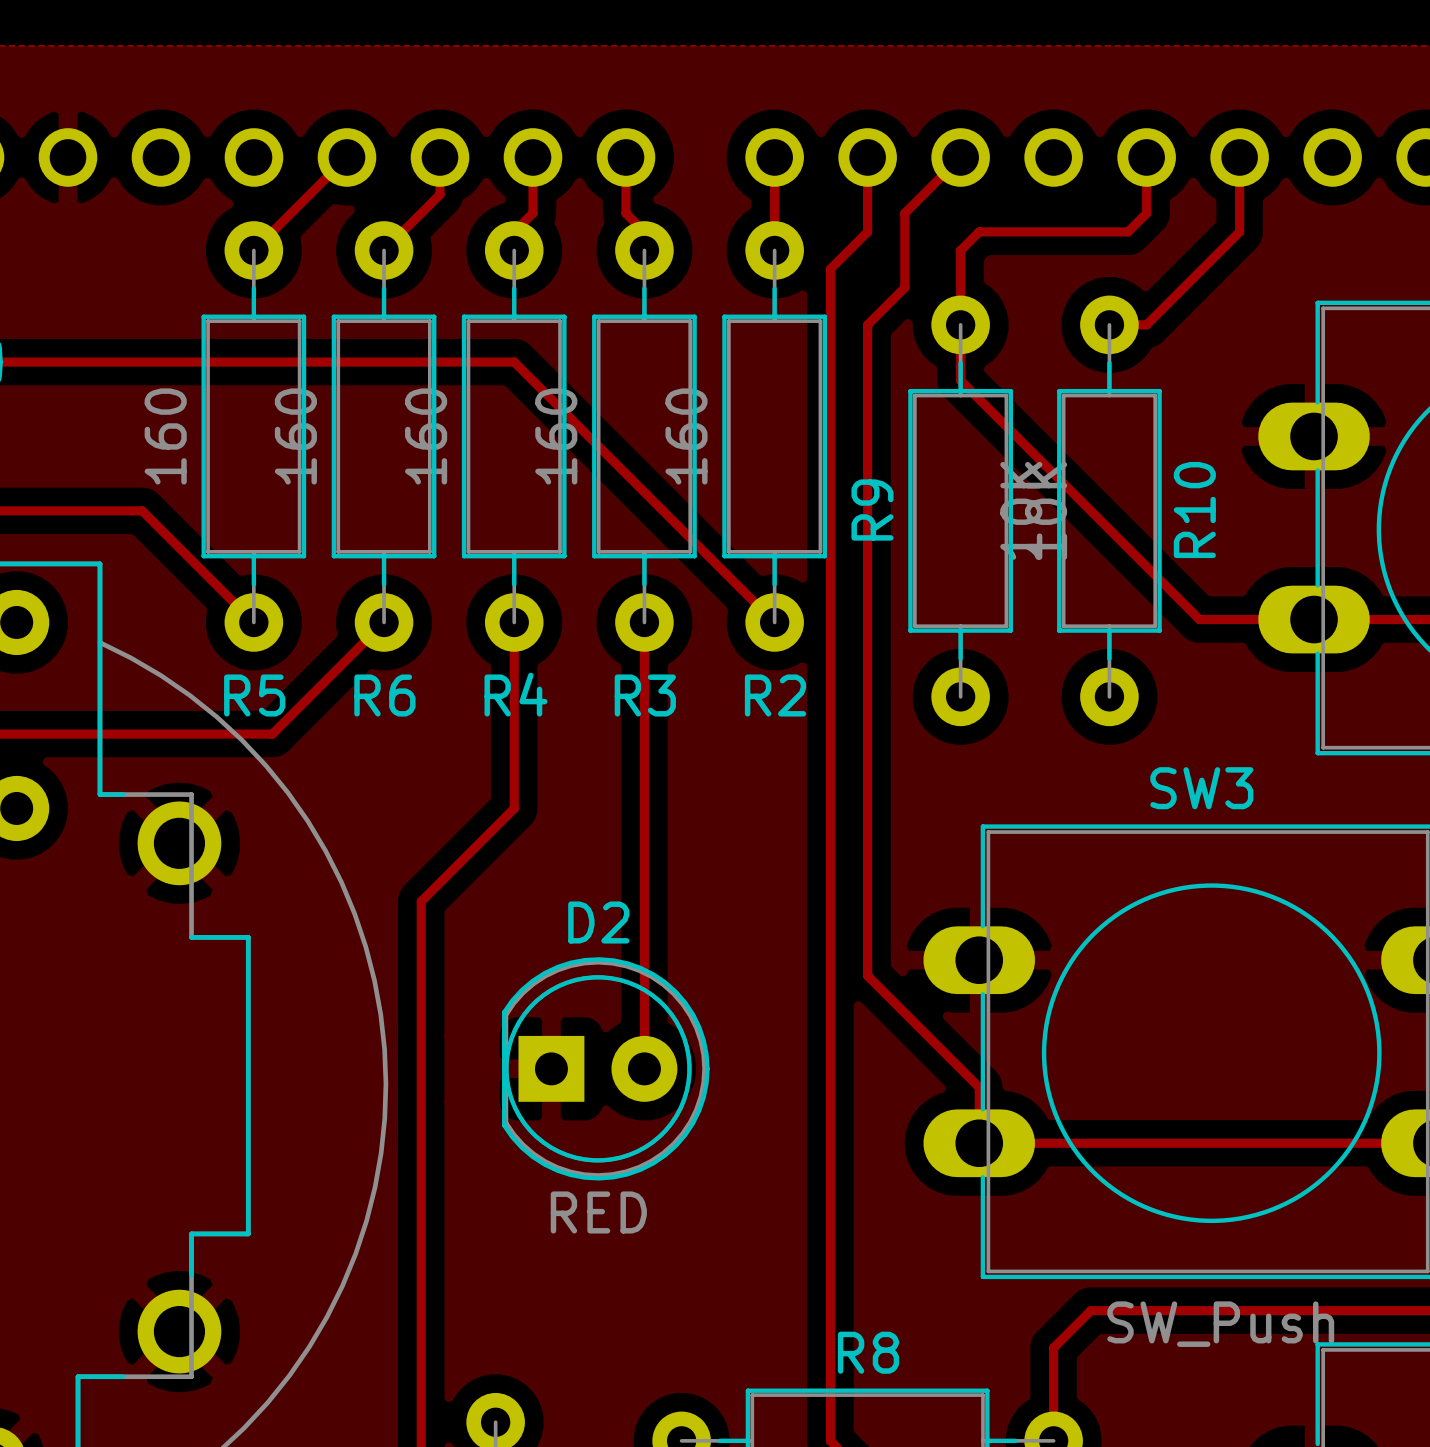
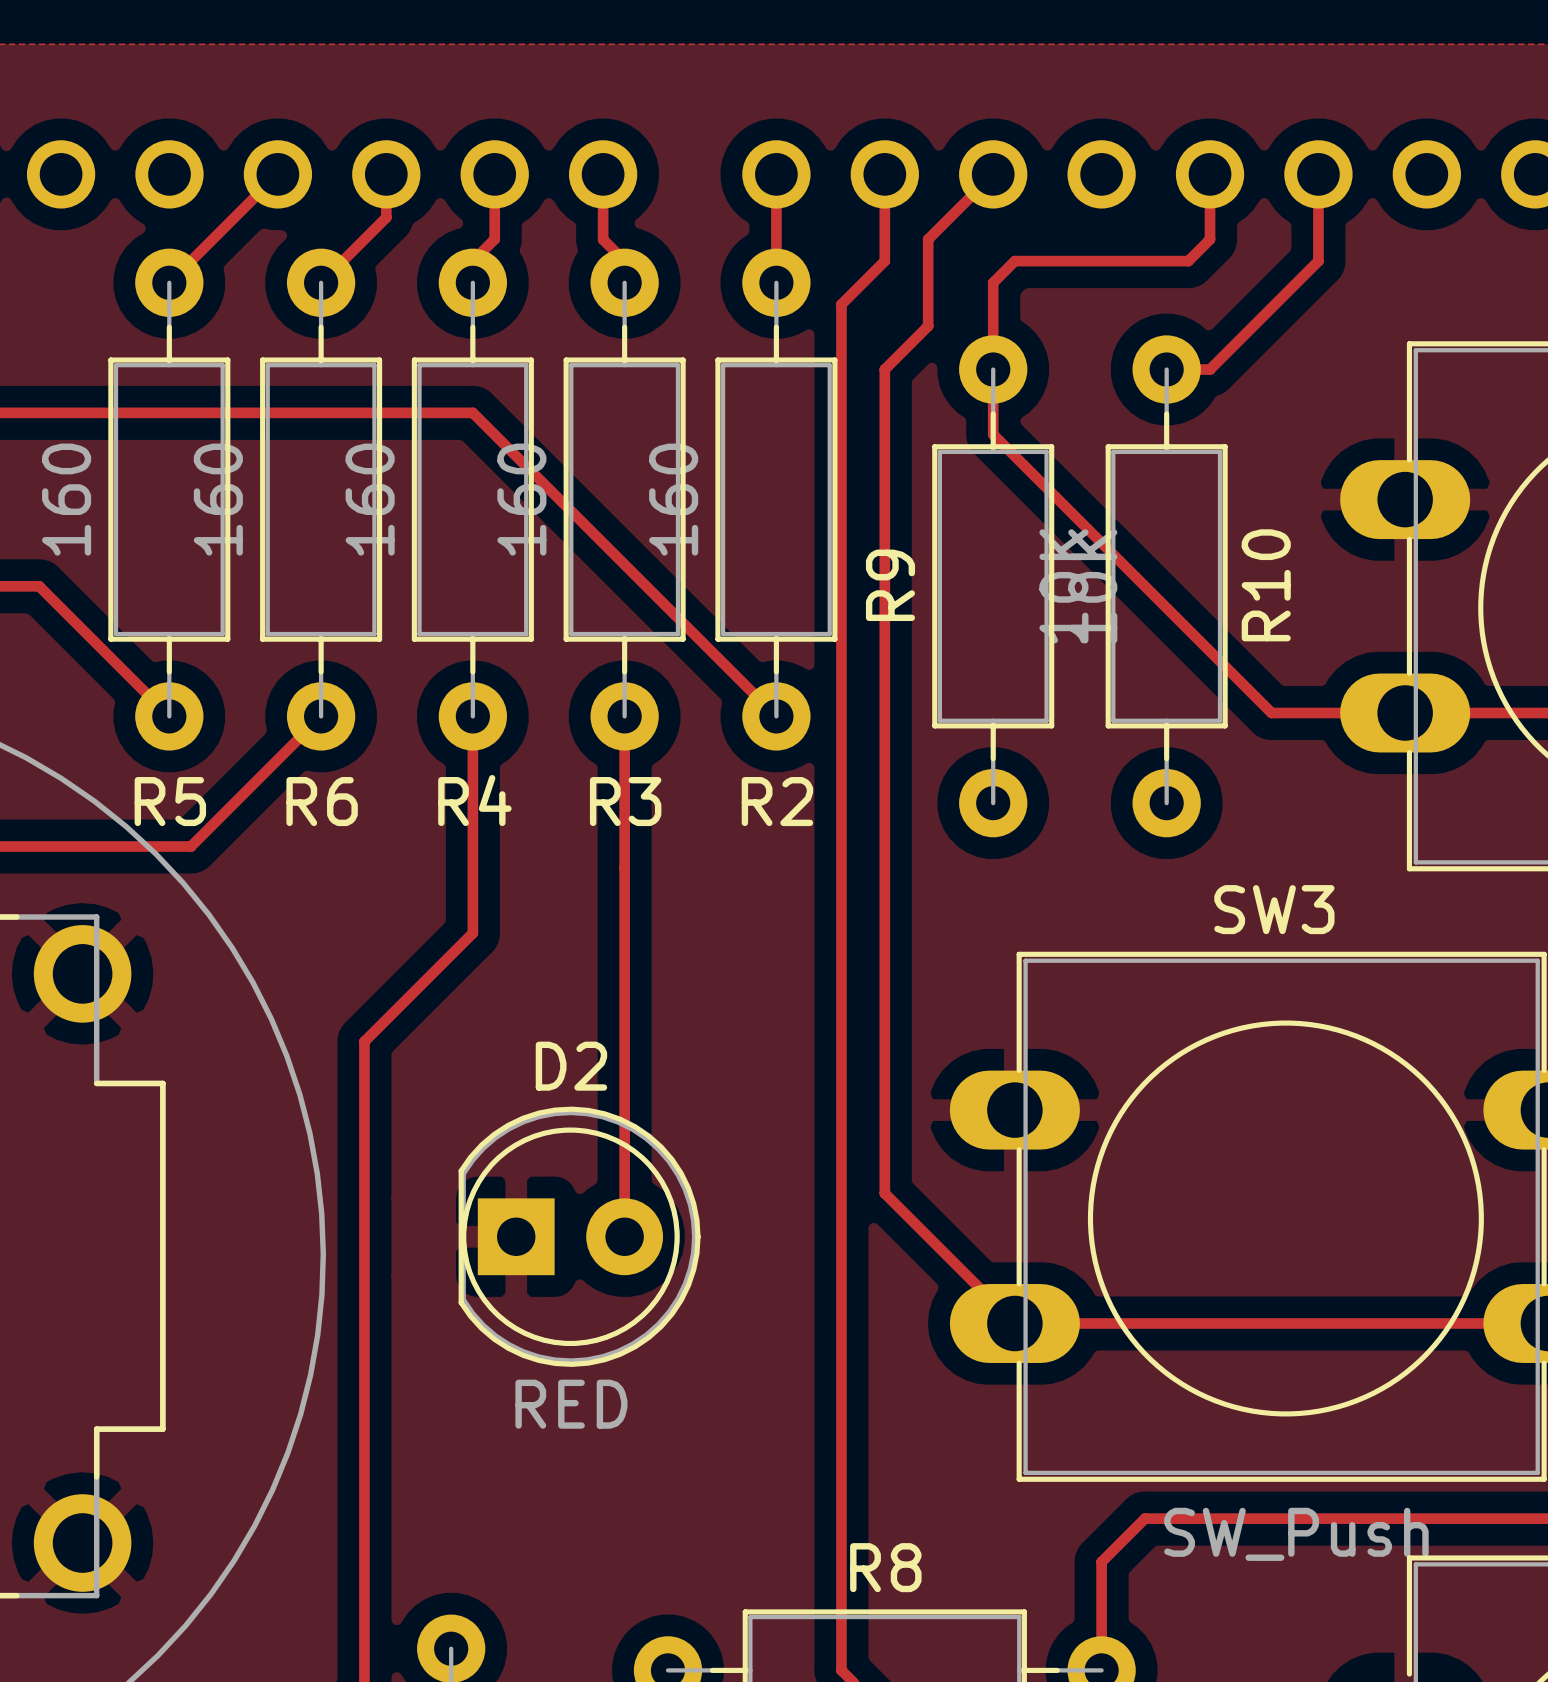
track: (867, 975) (979, 1087) (979, 1143) -> (884, 1128) (884, 1193) (1014, 1323)

